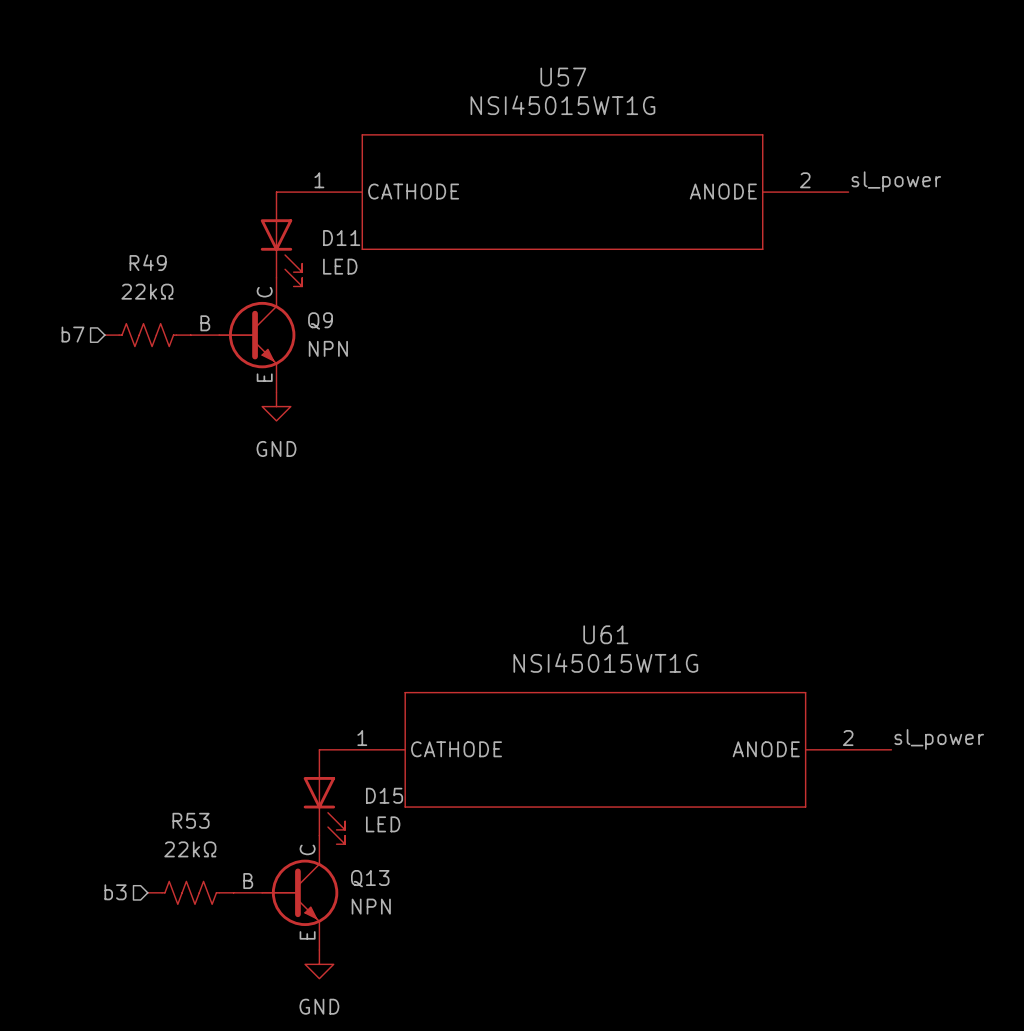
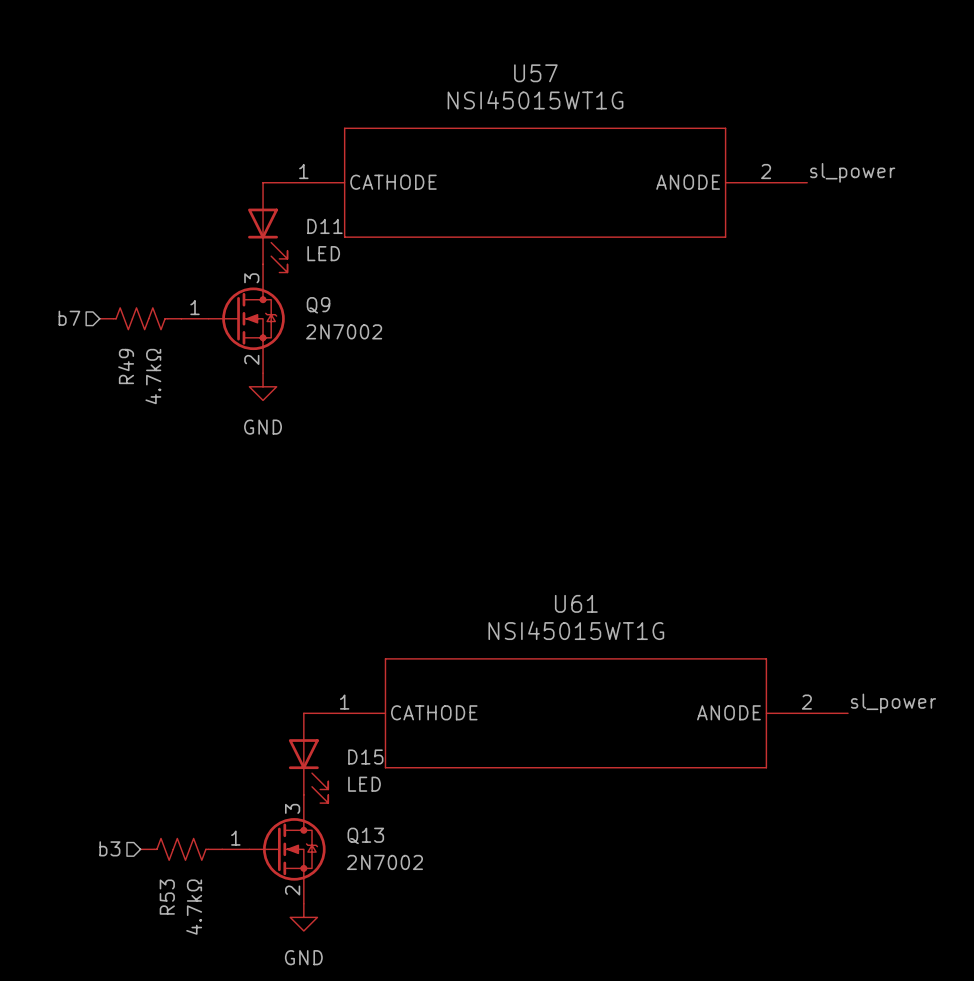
R49 name rotation: 0° (148, 262) -> 90° counterclockwise (126, 366)
R49 name position: R49 (148, 262) -> R49 (126, 366)
Q9 symbol: [190, 277, 296, 393] -> [181, 264, 285, 374]
R49 value: 22kΩ (147, 291) -> 4.7kΩ (153, 376)
Q9 value: NPN (328, 348) -> 2N7002 (344, 331)
R53 name rotation: 0° (191, 820) -> 90° counterclockwise (167, 897)
R53 name position: R53 (191, 820) -> R53 (167, 897)
Q13 symbol: [233, 835, 339, 951] -> [222, 794, 326, 904]
R53 value: 22kΩ (190, 849) -> 4.7kΩ (194, 907)
Q13 value: NPN (371, 906) -> 2N7002 (384, 862)

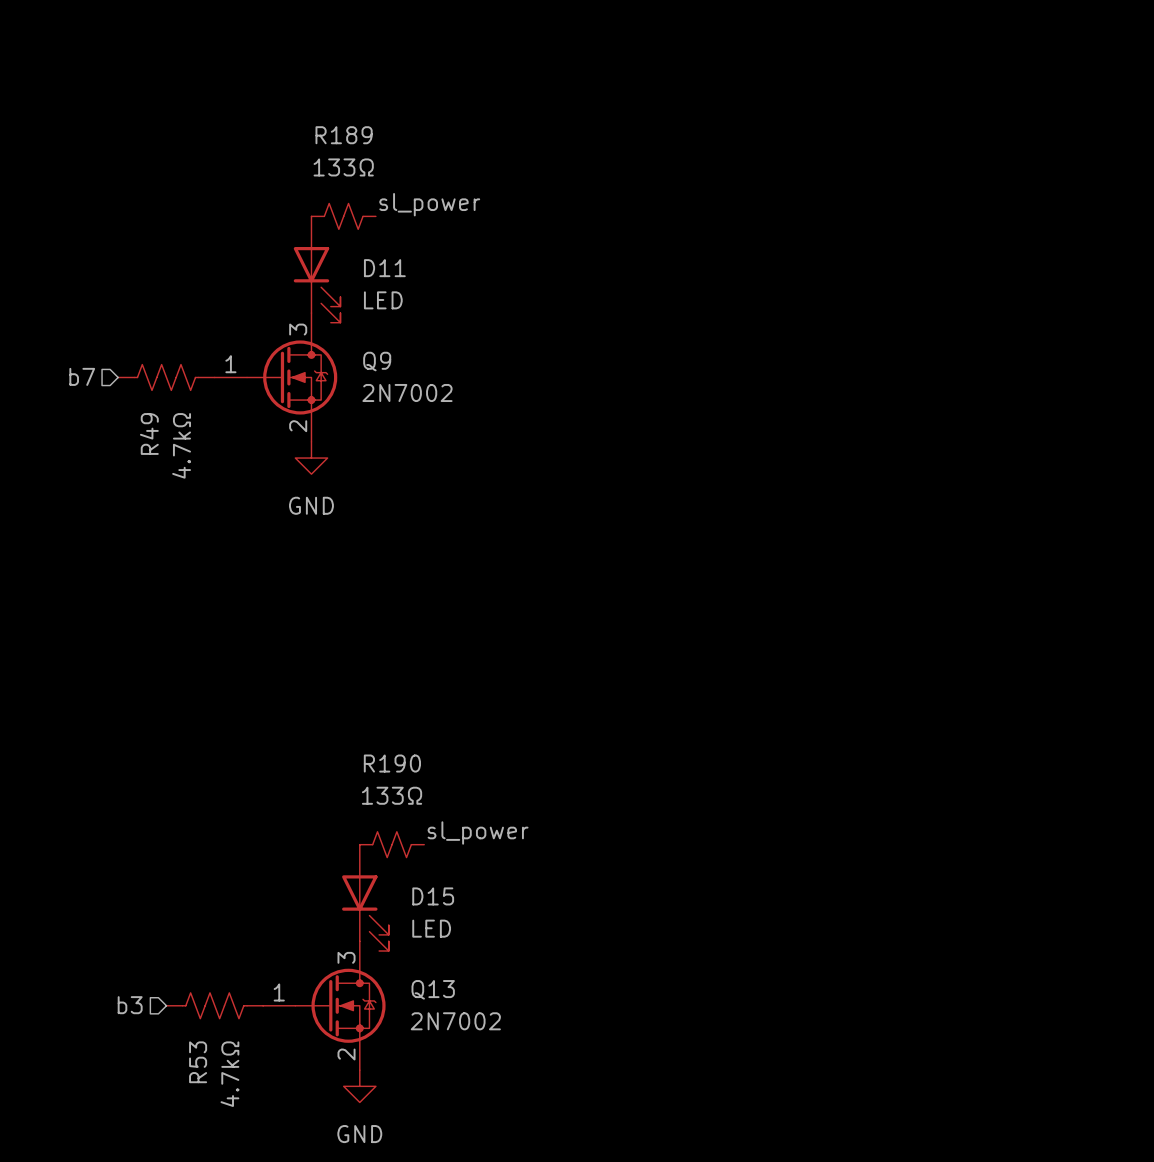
label: none -> sl_power (429, 204)
label: sl_power (852, 172) -> none
R189: none -> 133Ω (343, 216)
U57: NSI45015WT1G (535, 182) -> none
label: none -> sl_power (478, 832)
label: sl_power (893, 703) -> none
R190: none -> 133Ω (392, 844)
U61: NSI45015WT1G (575, 713) -> none

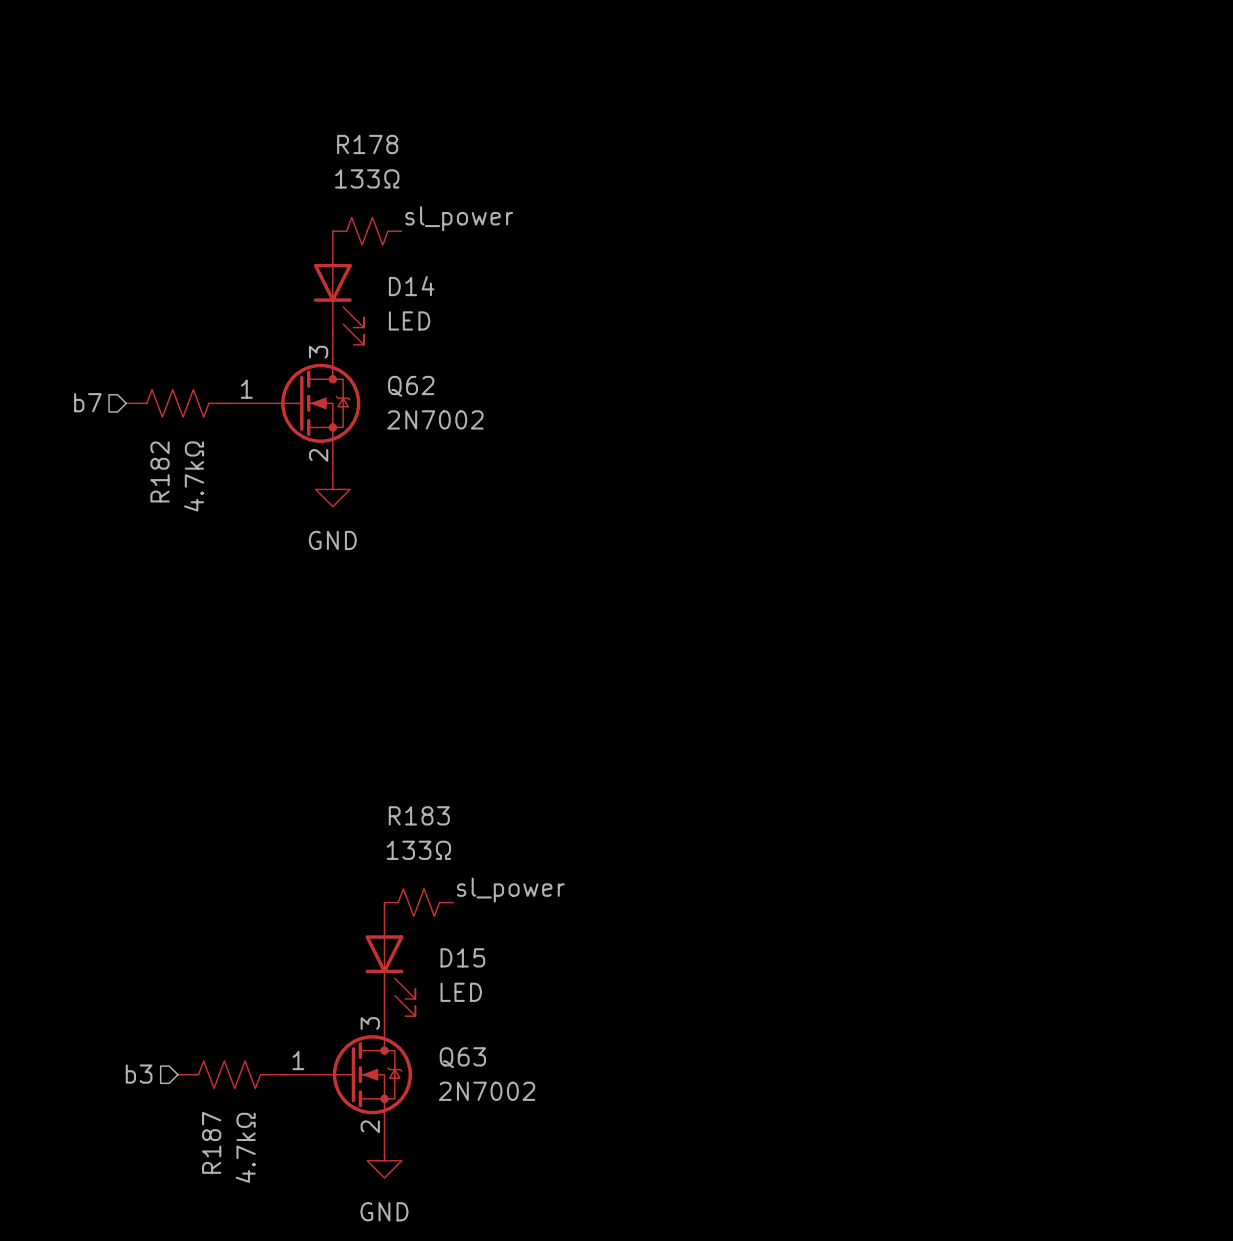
R189 name: R189 (344, 135) -> R178 (367, 144)
D11 name: D11 (384, 268) -> D14 (411, 286)
Q9 name: Q9 (377, 361) -> Q62 (411, 386)
R49 name: R49 (149, 433) -> R182 (160, 471)
R190 name: R190 (392, 763) -> R183 (419, 815)
Q13 name: Q13 (433, 989) -> Q63 (462, 1057)
R53 name: R53 (198, 1062) -> R187 (211, 1142)

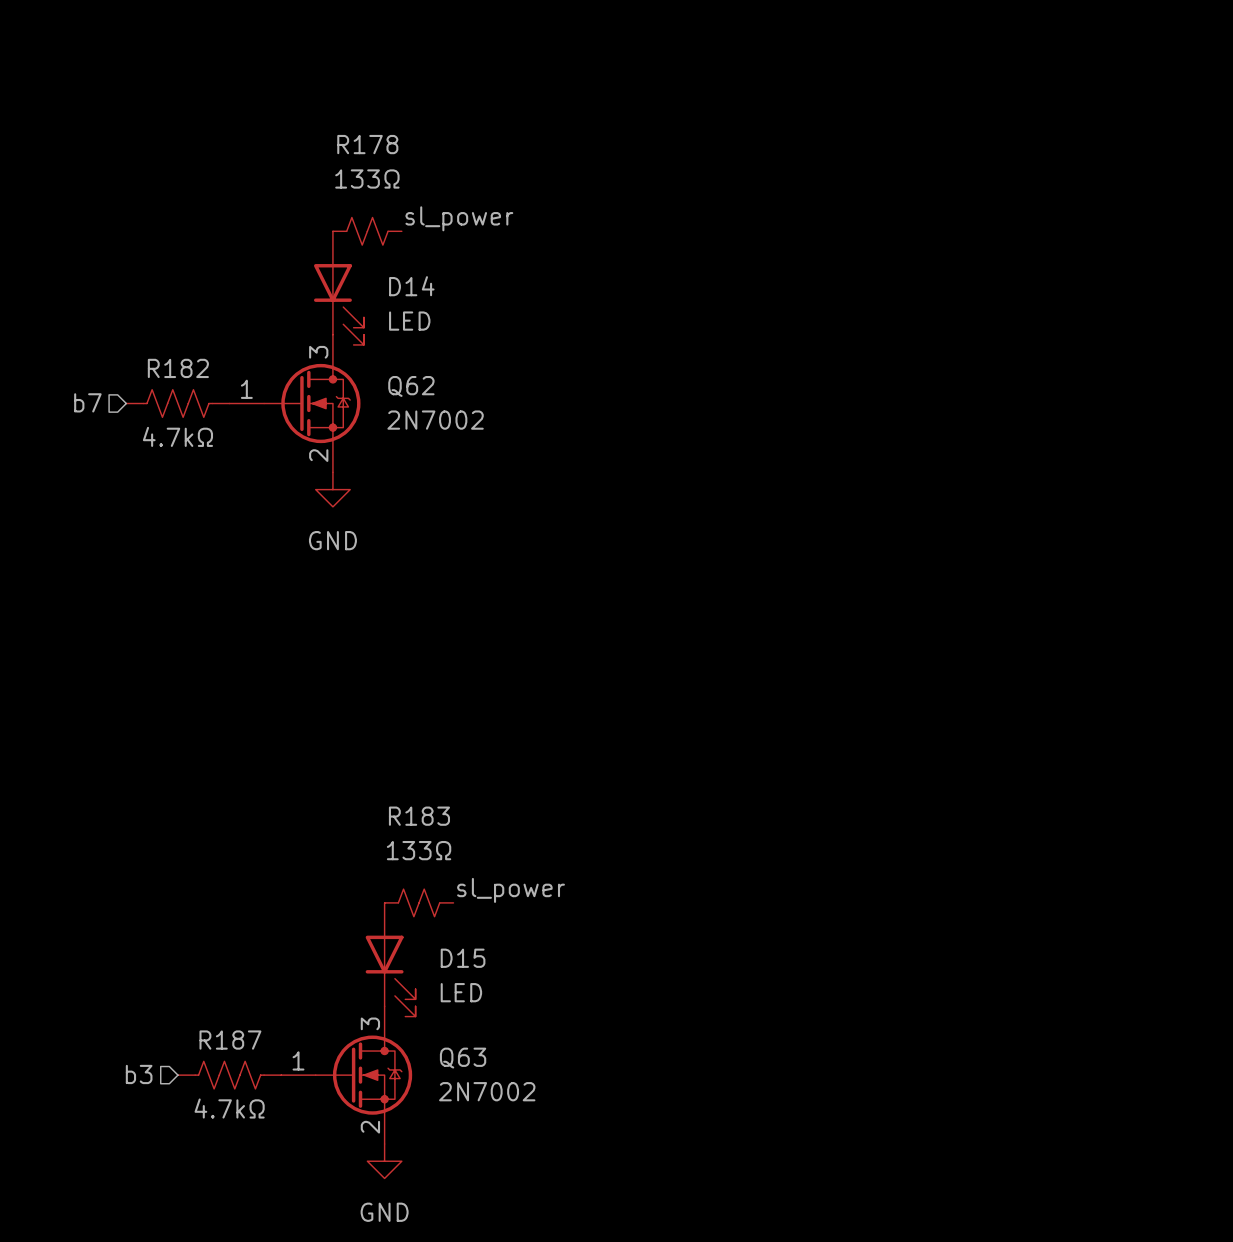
R182 name rotation: 0° (160, 471) -> 90° clockwise (178, 368)
R182 name position: R182 (160, 471) -> R182 (178, 368)
R182 value rotation: 0° (194, 476) -> 90° clockwise (177, 436)
R187 name rotation: 0° (211, 1142) -> 90° clockwise (230, 1040)
R187 name position: R187 (211, 1142) -> R187 (230, 1040)
R187 value rotation: 0° (245, 1147) -> 90° clockwise (229, 1108)

